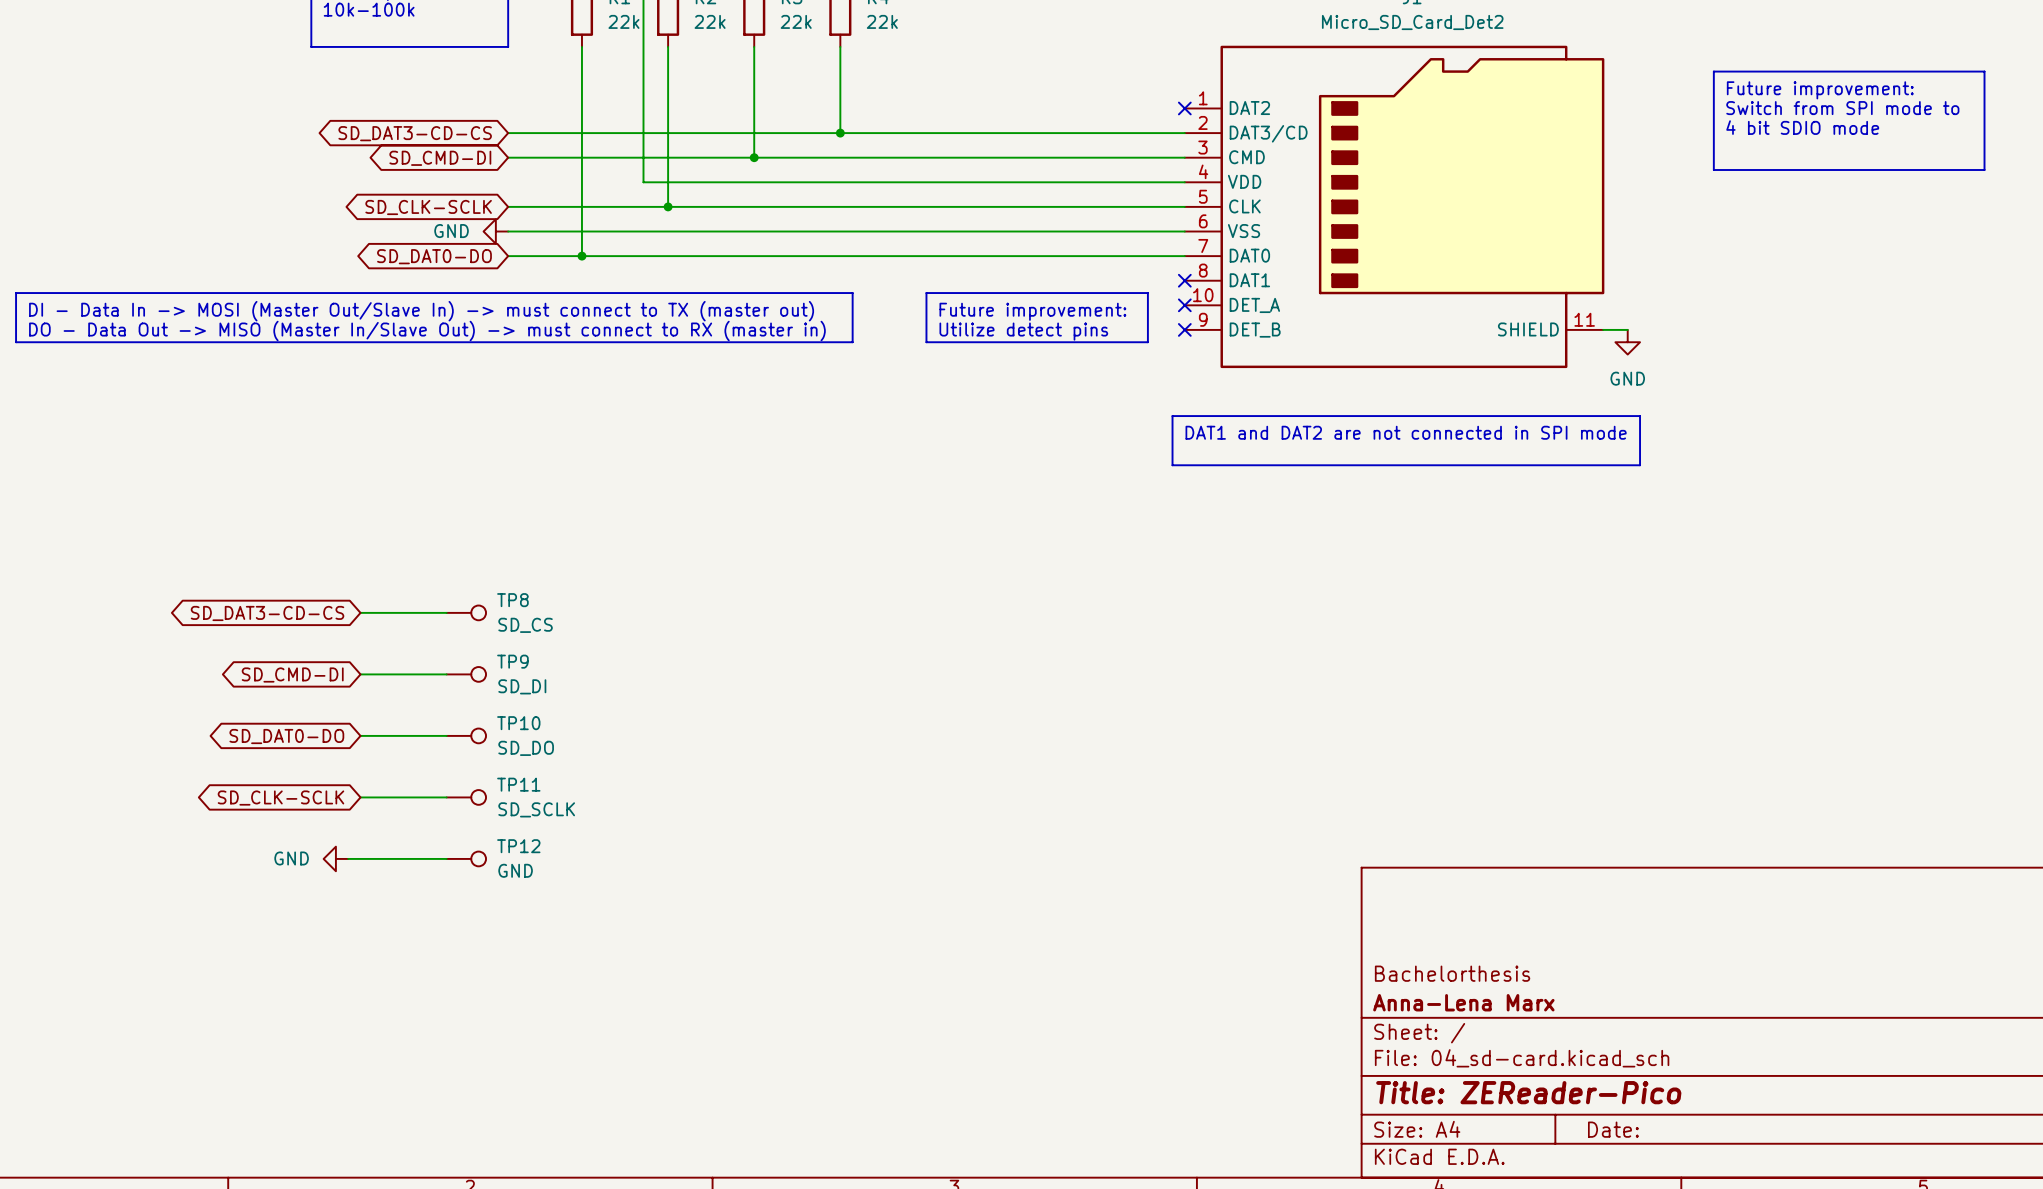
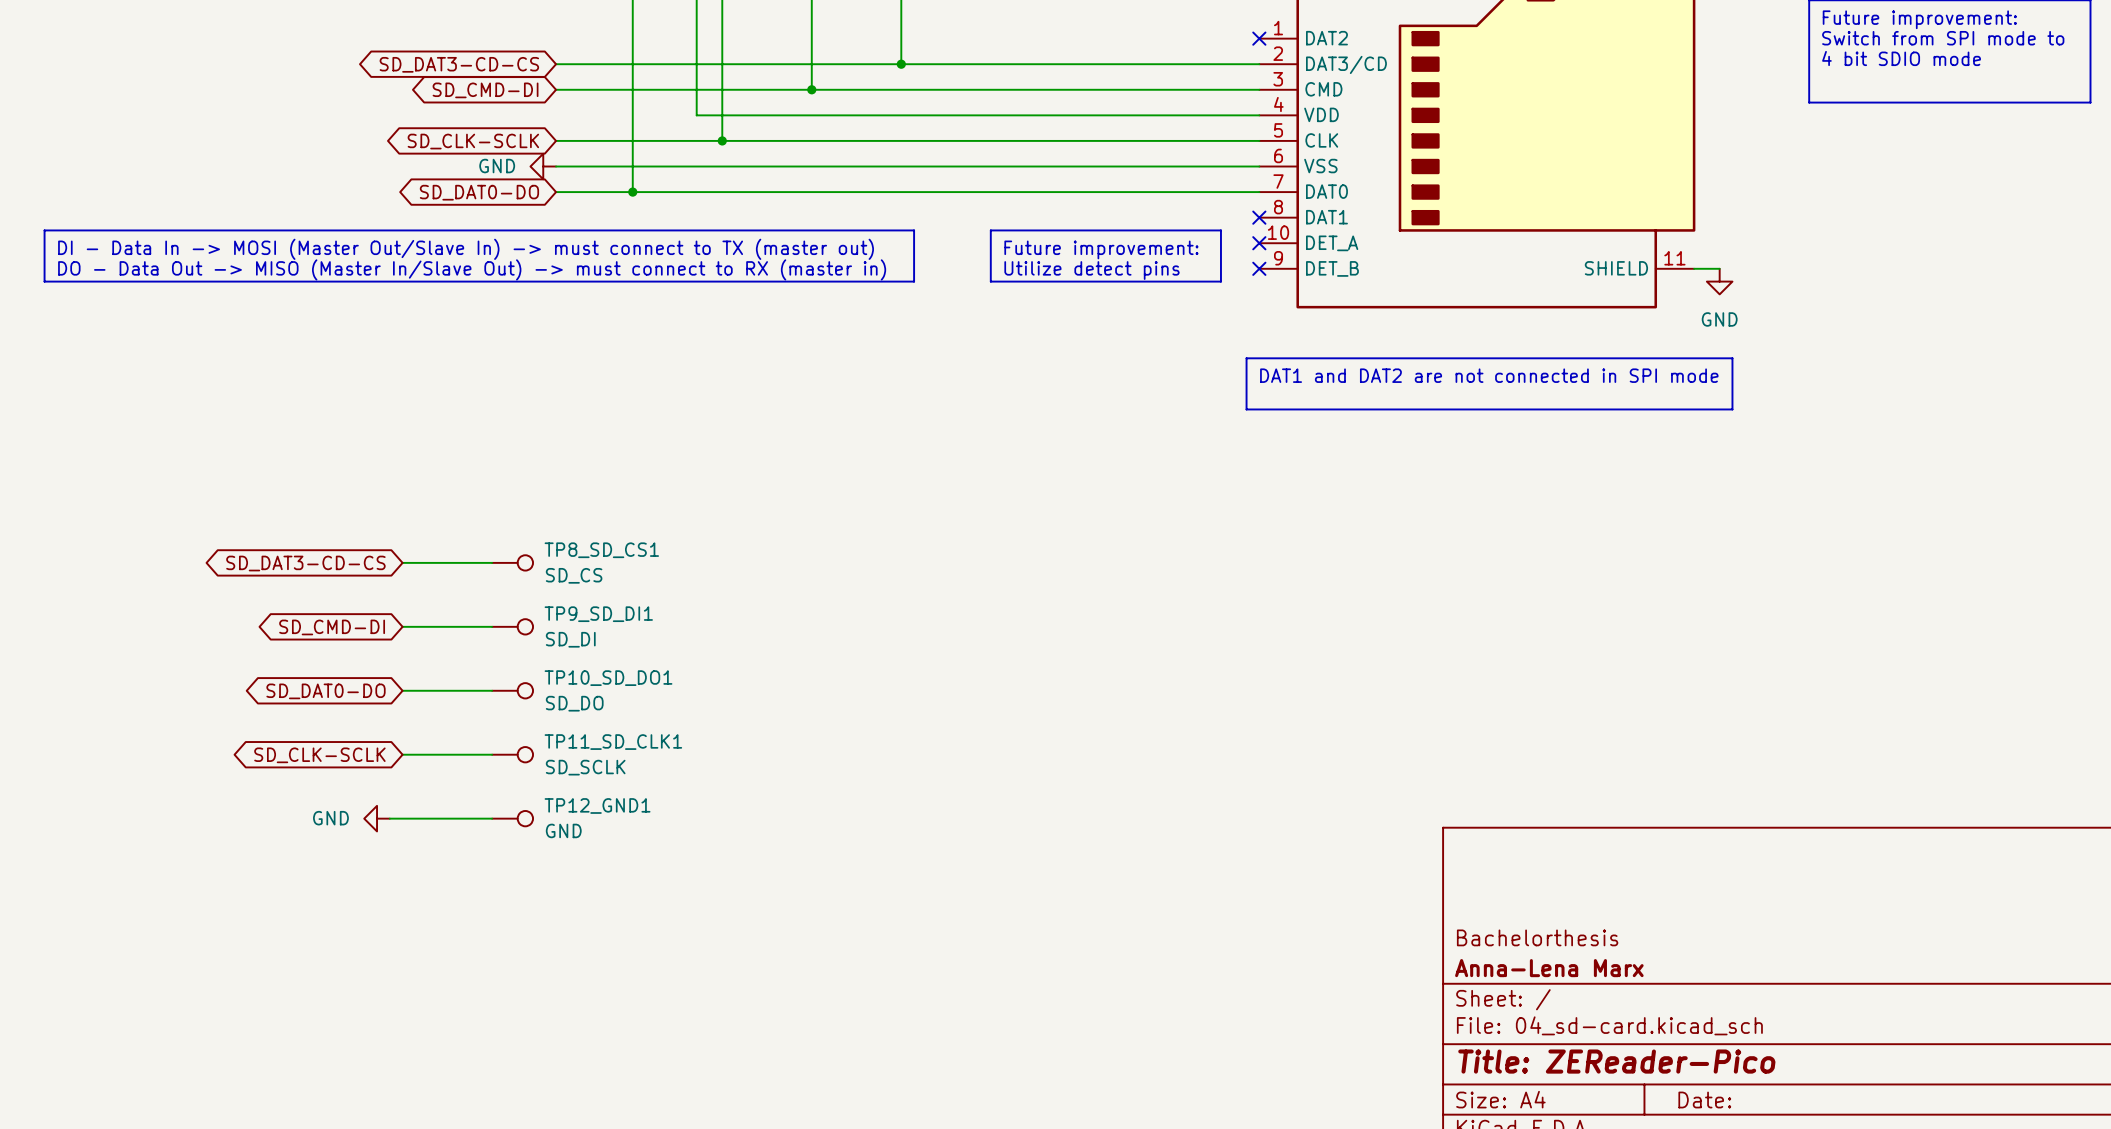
TP8 name: TP8 (512, 600) -> TP8_SD_CS1 (601, 550)
TP9 name: TP9 (512, 661) -> TP9_SD_DI1 (598, 614)
TP10 name: TP10 (518, 723) -> TP10_SD_DO1 (608, 678)
TP11 name: TP11 (518, 784) -> TP11_SD_CLK1 (613, 742)
TP12 name: TP12 (518, 846) -> TP12_GND1 (597, 805)

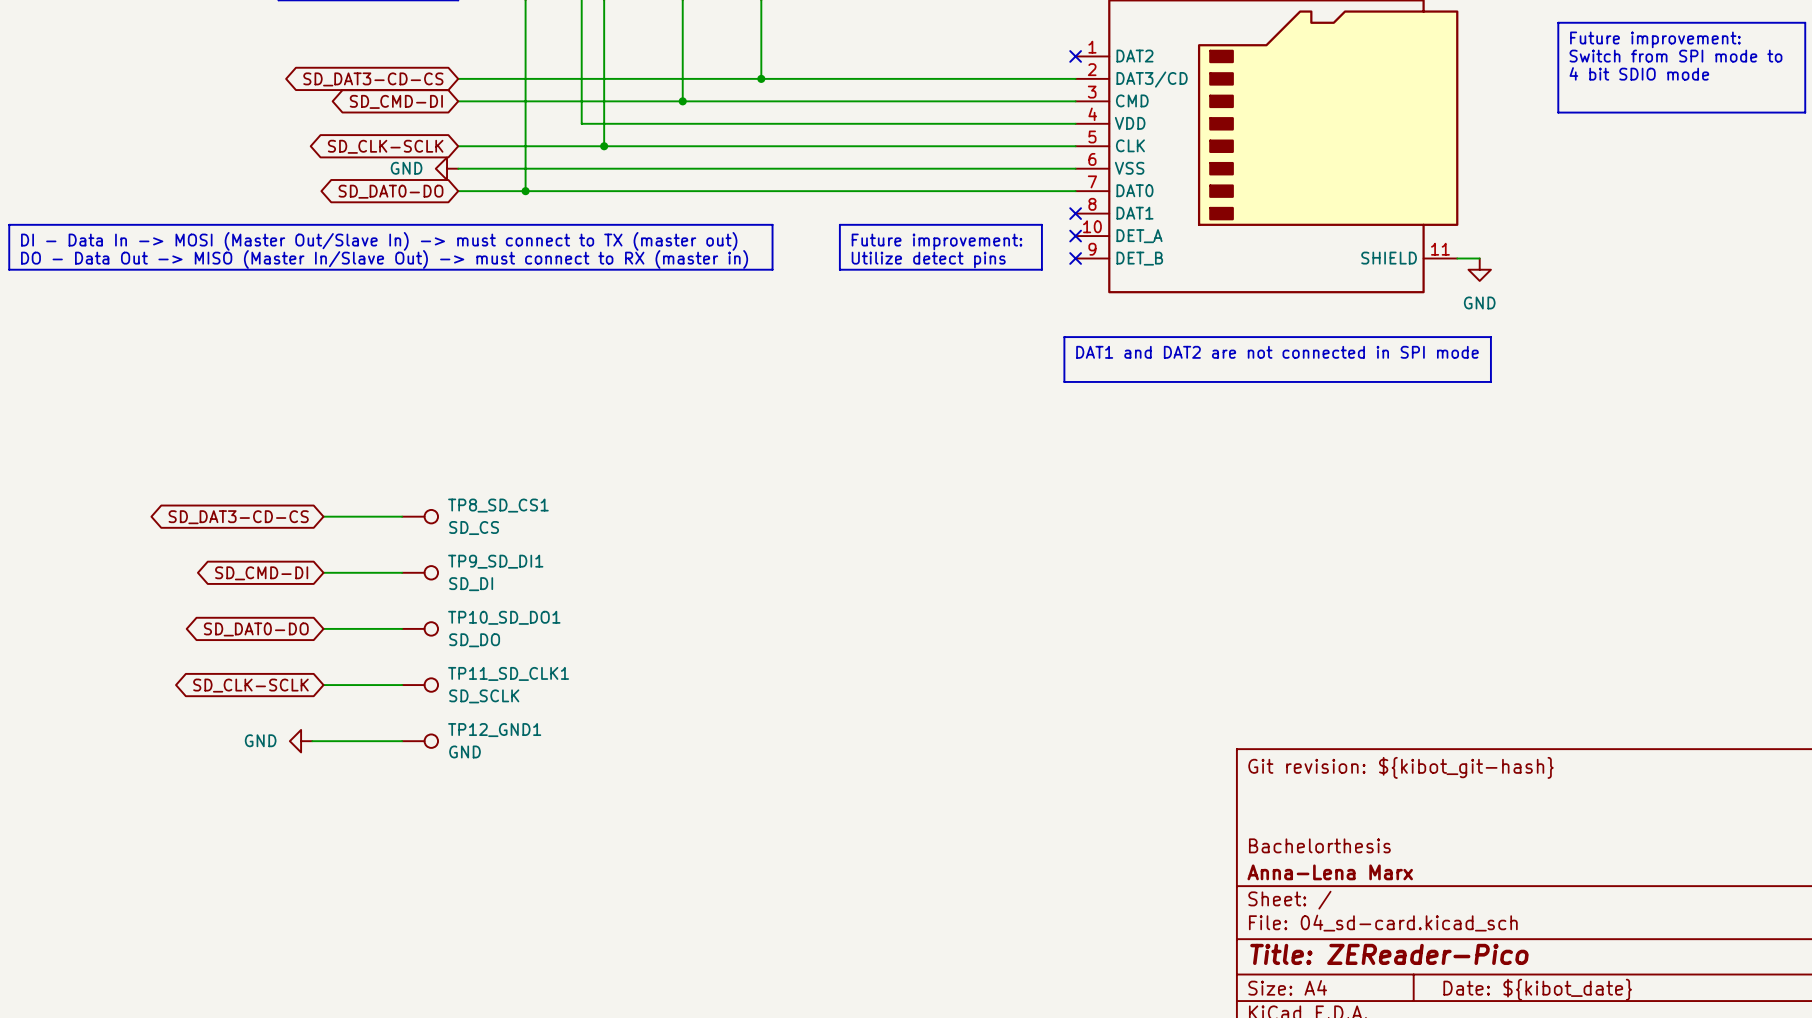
title block: none -> Git revision: ${kibot_git-hash} (1401, 767)
title block: Date: (1704, 1100) -> Date: ${kibot_date} (1537, 989)

